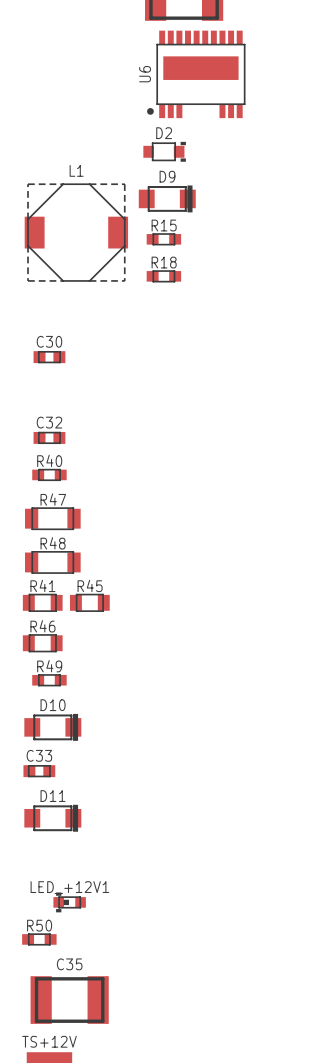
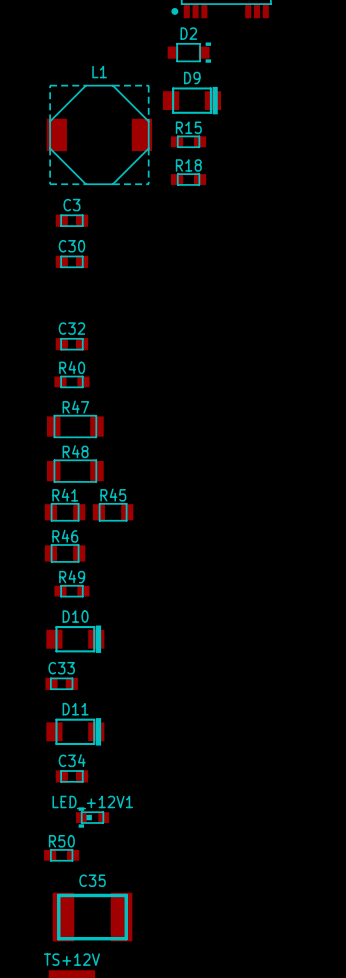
C3: none -> (71, 220)
C34: none -> (71, 776)

